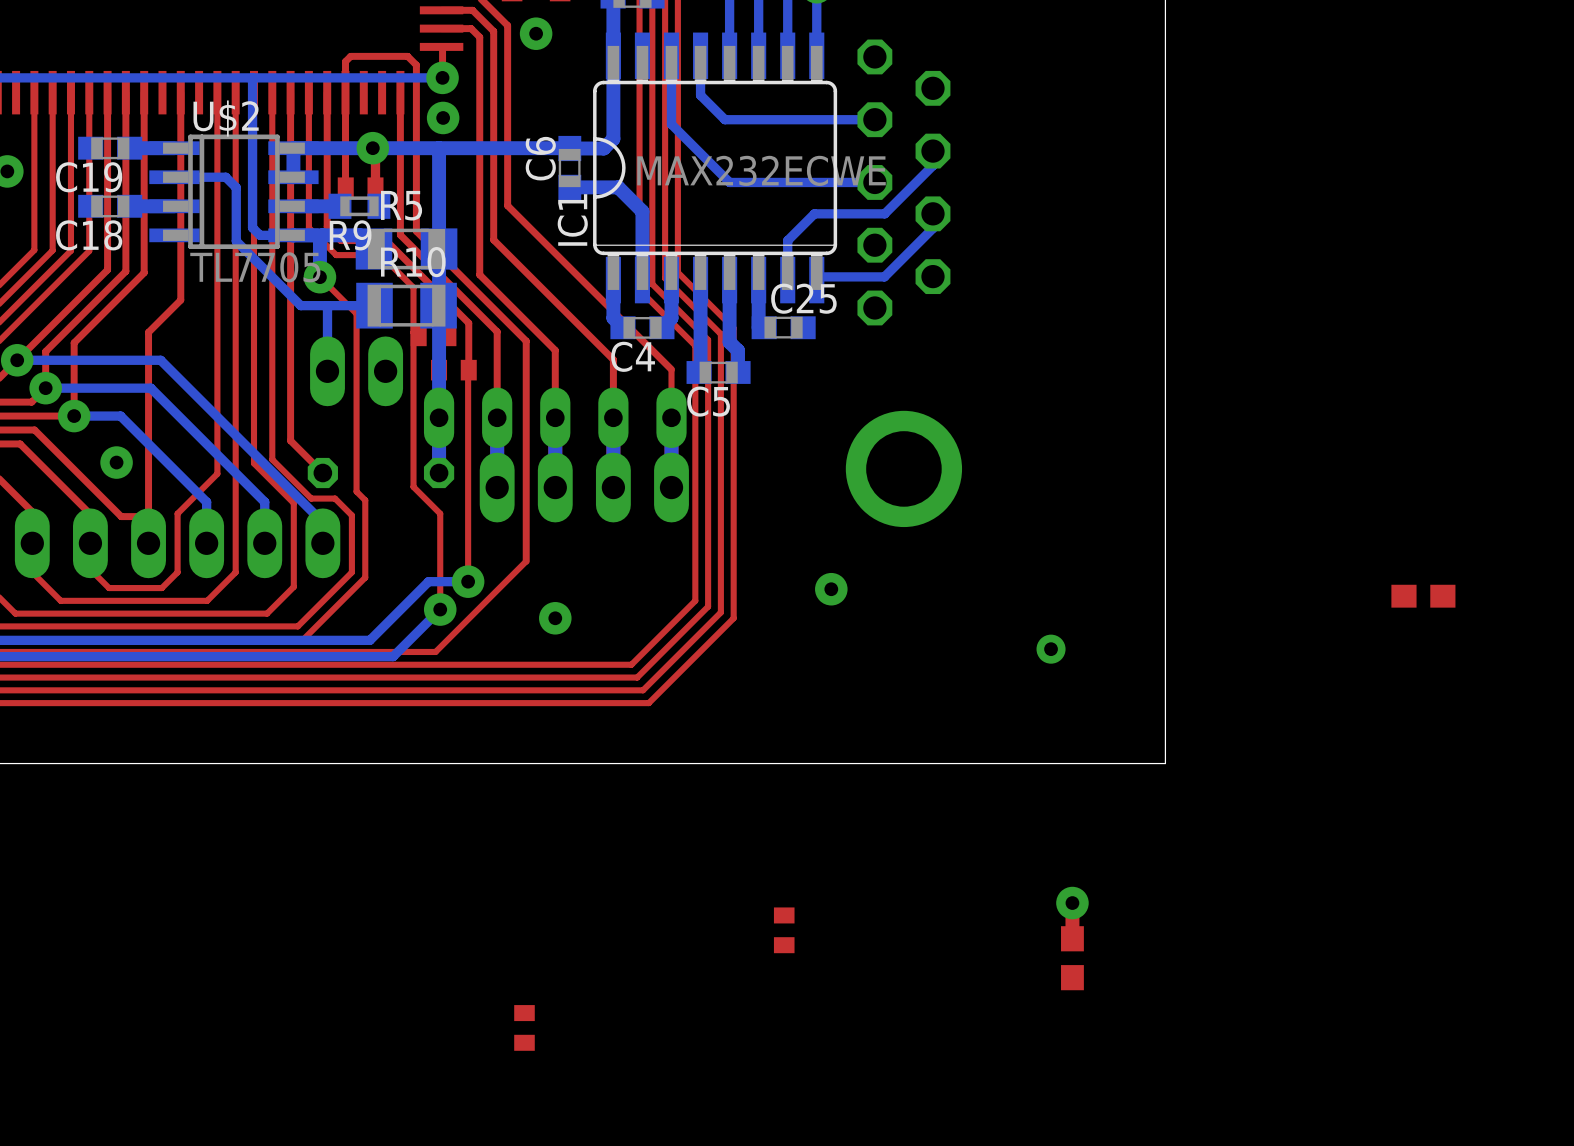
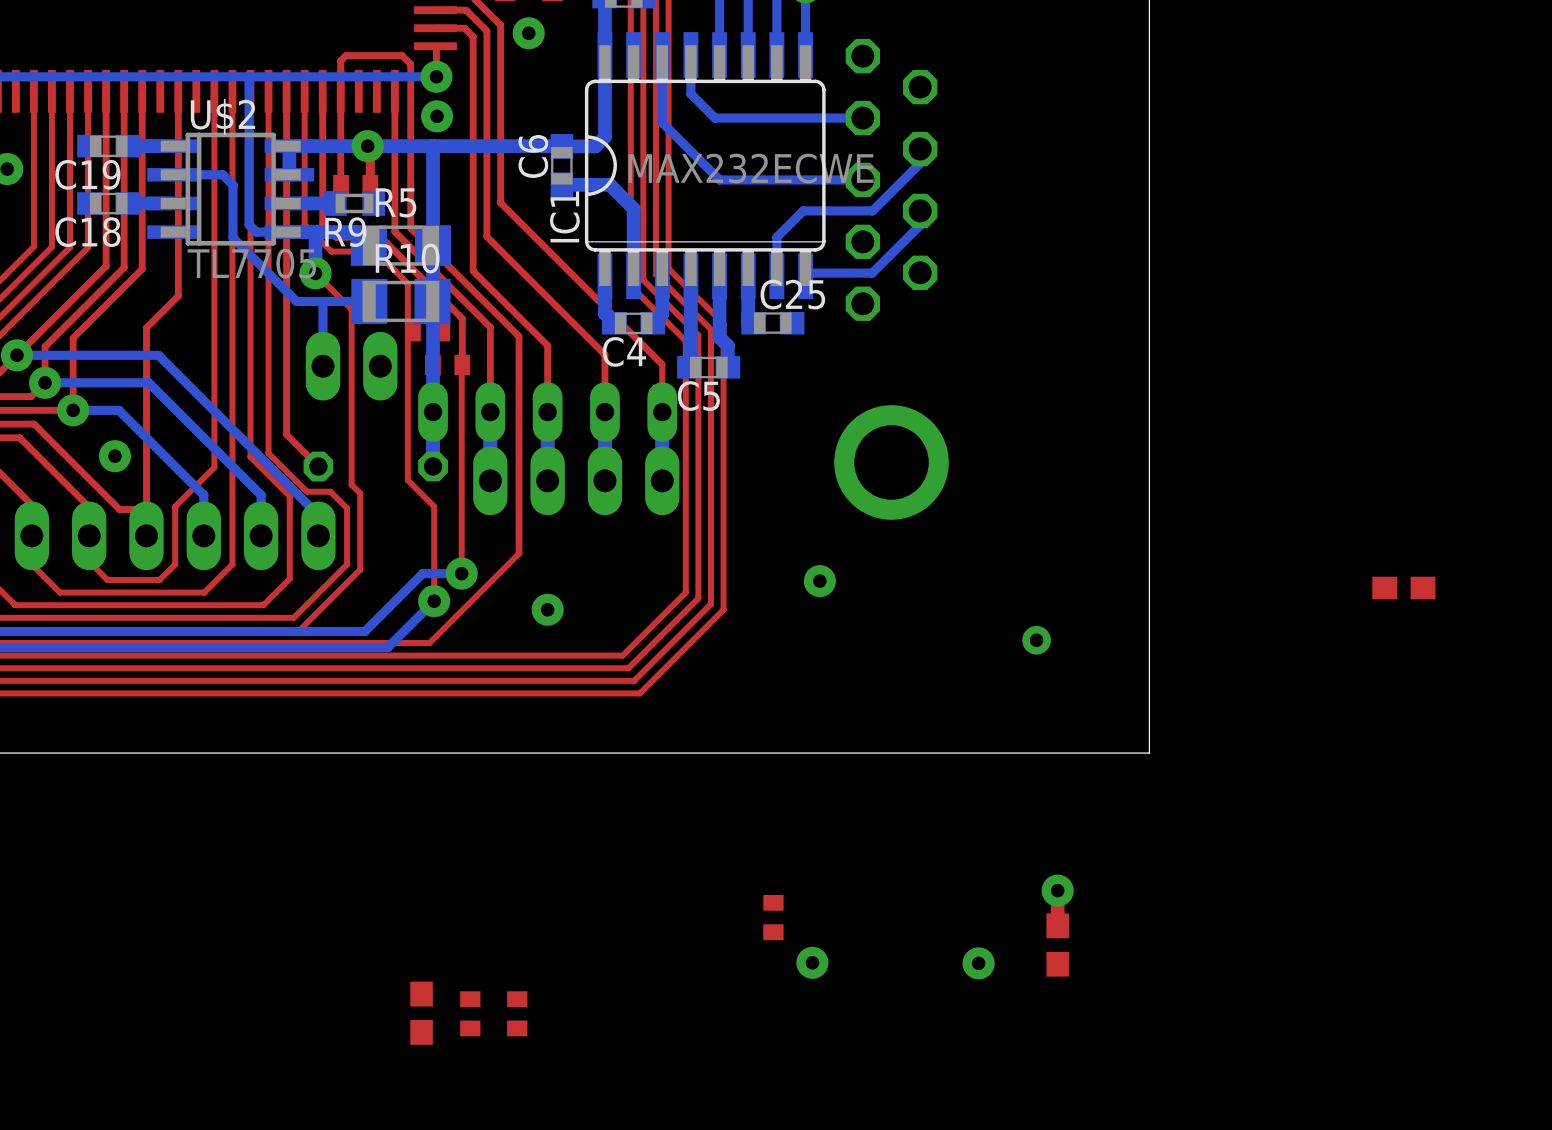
via: none -> (812, 962)
via: none -> (978, 963)
part: none -> (421, 1013)
part: none -> (470, 1013)

